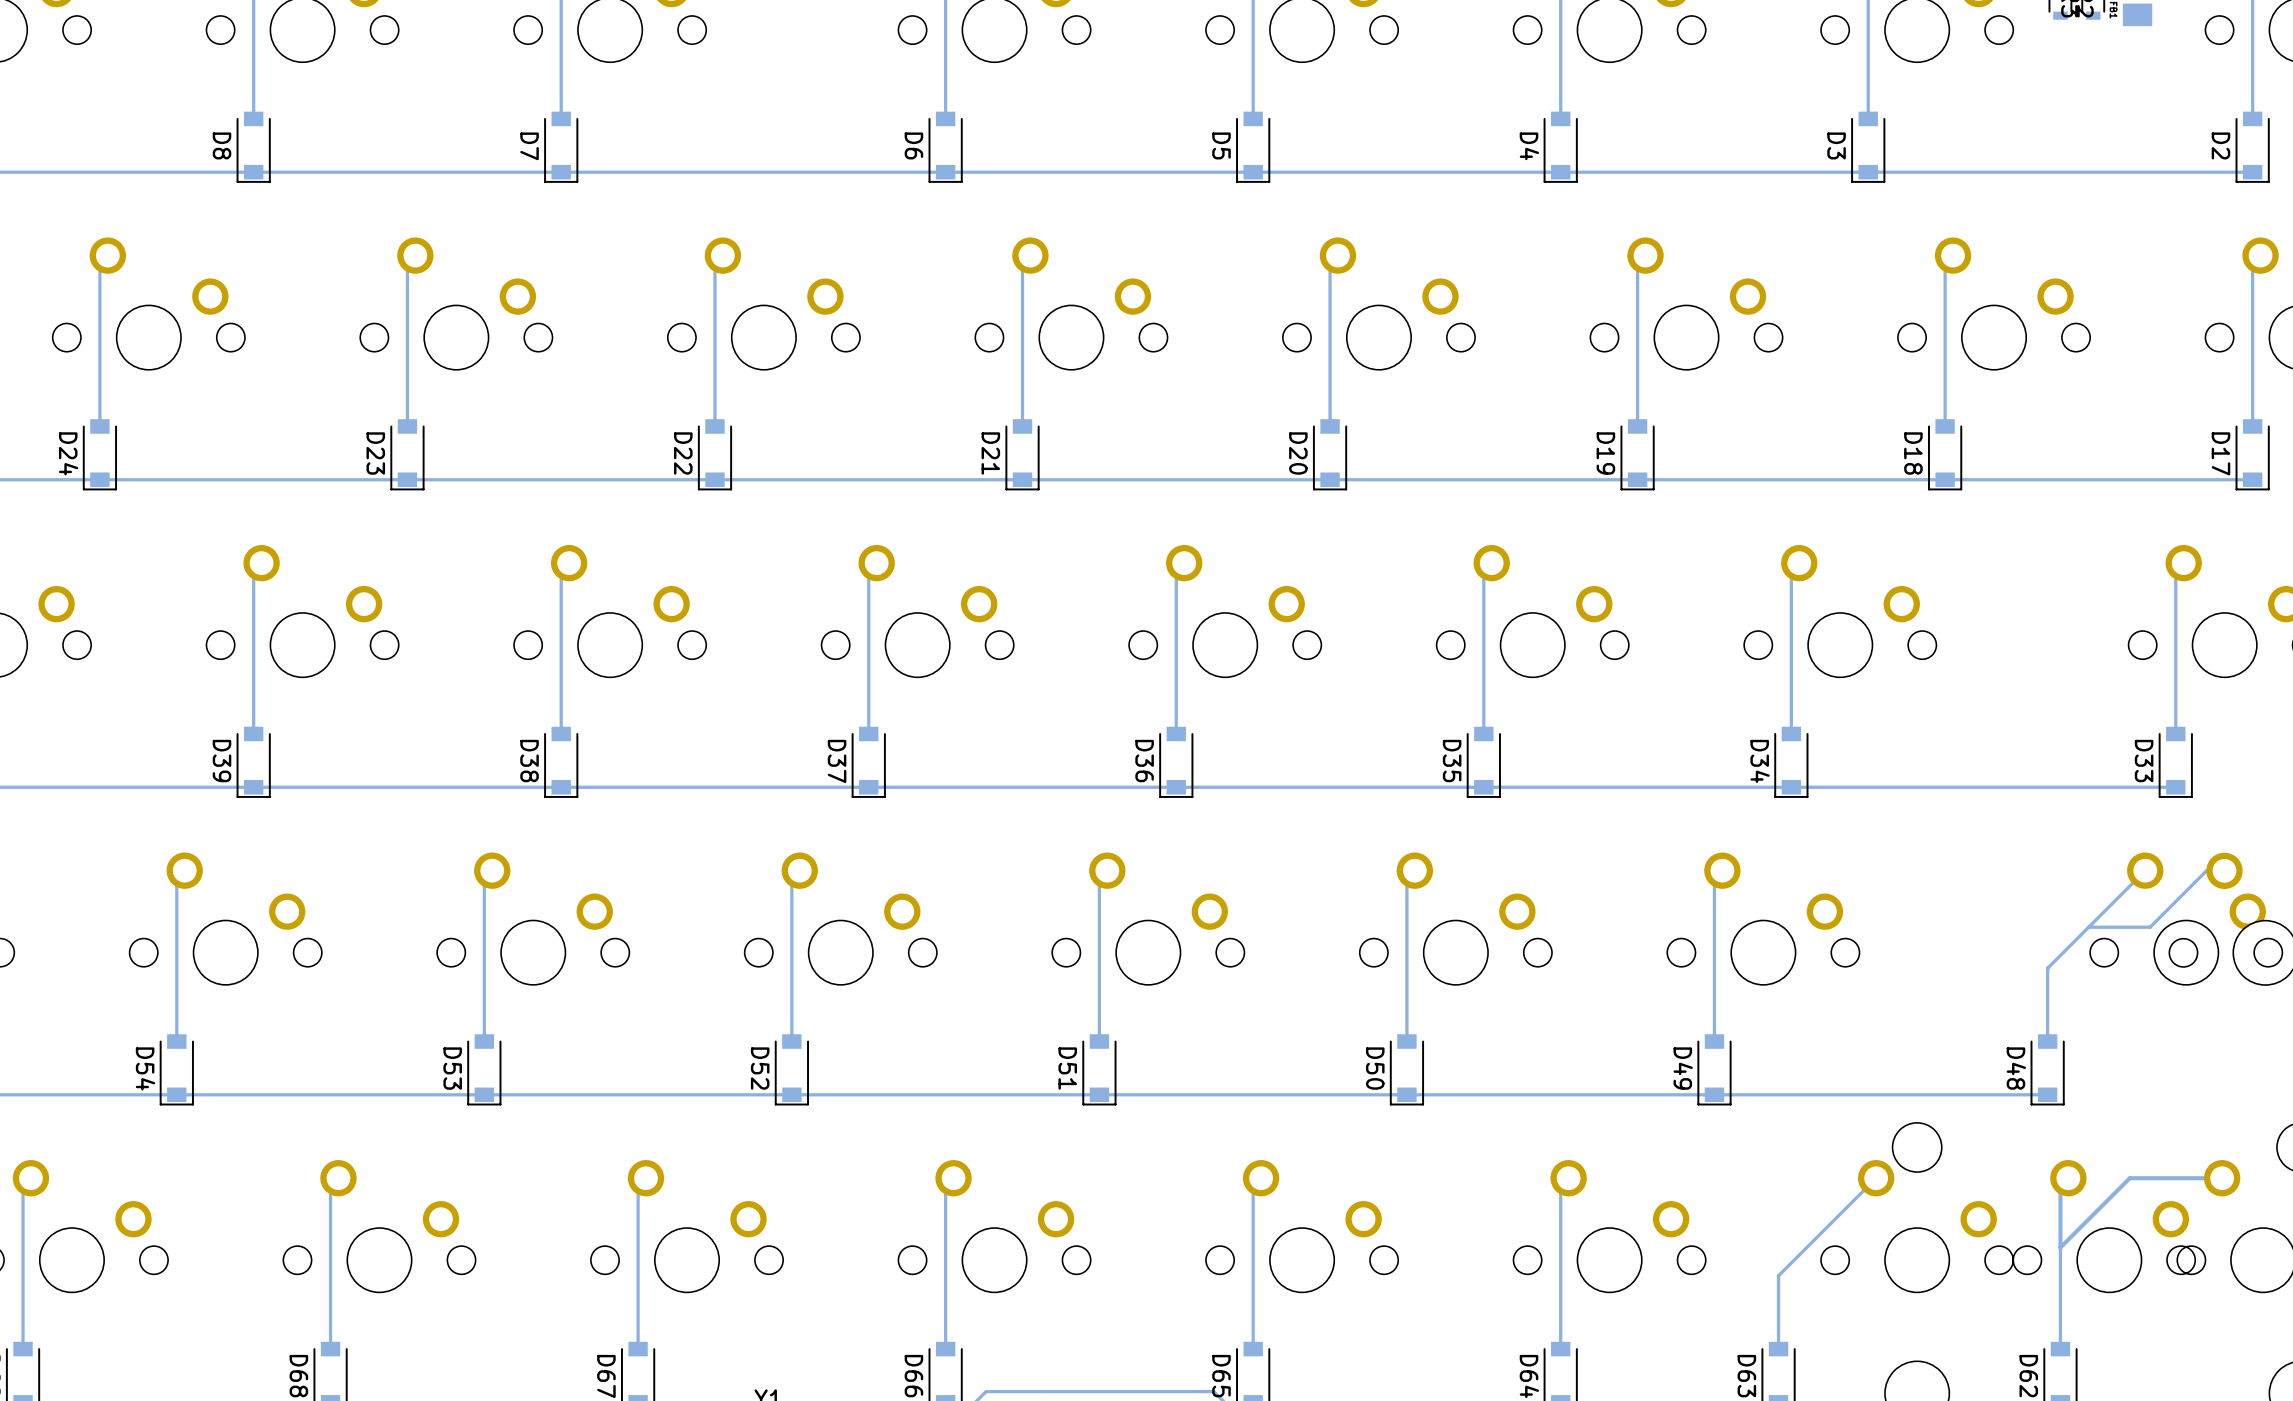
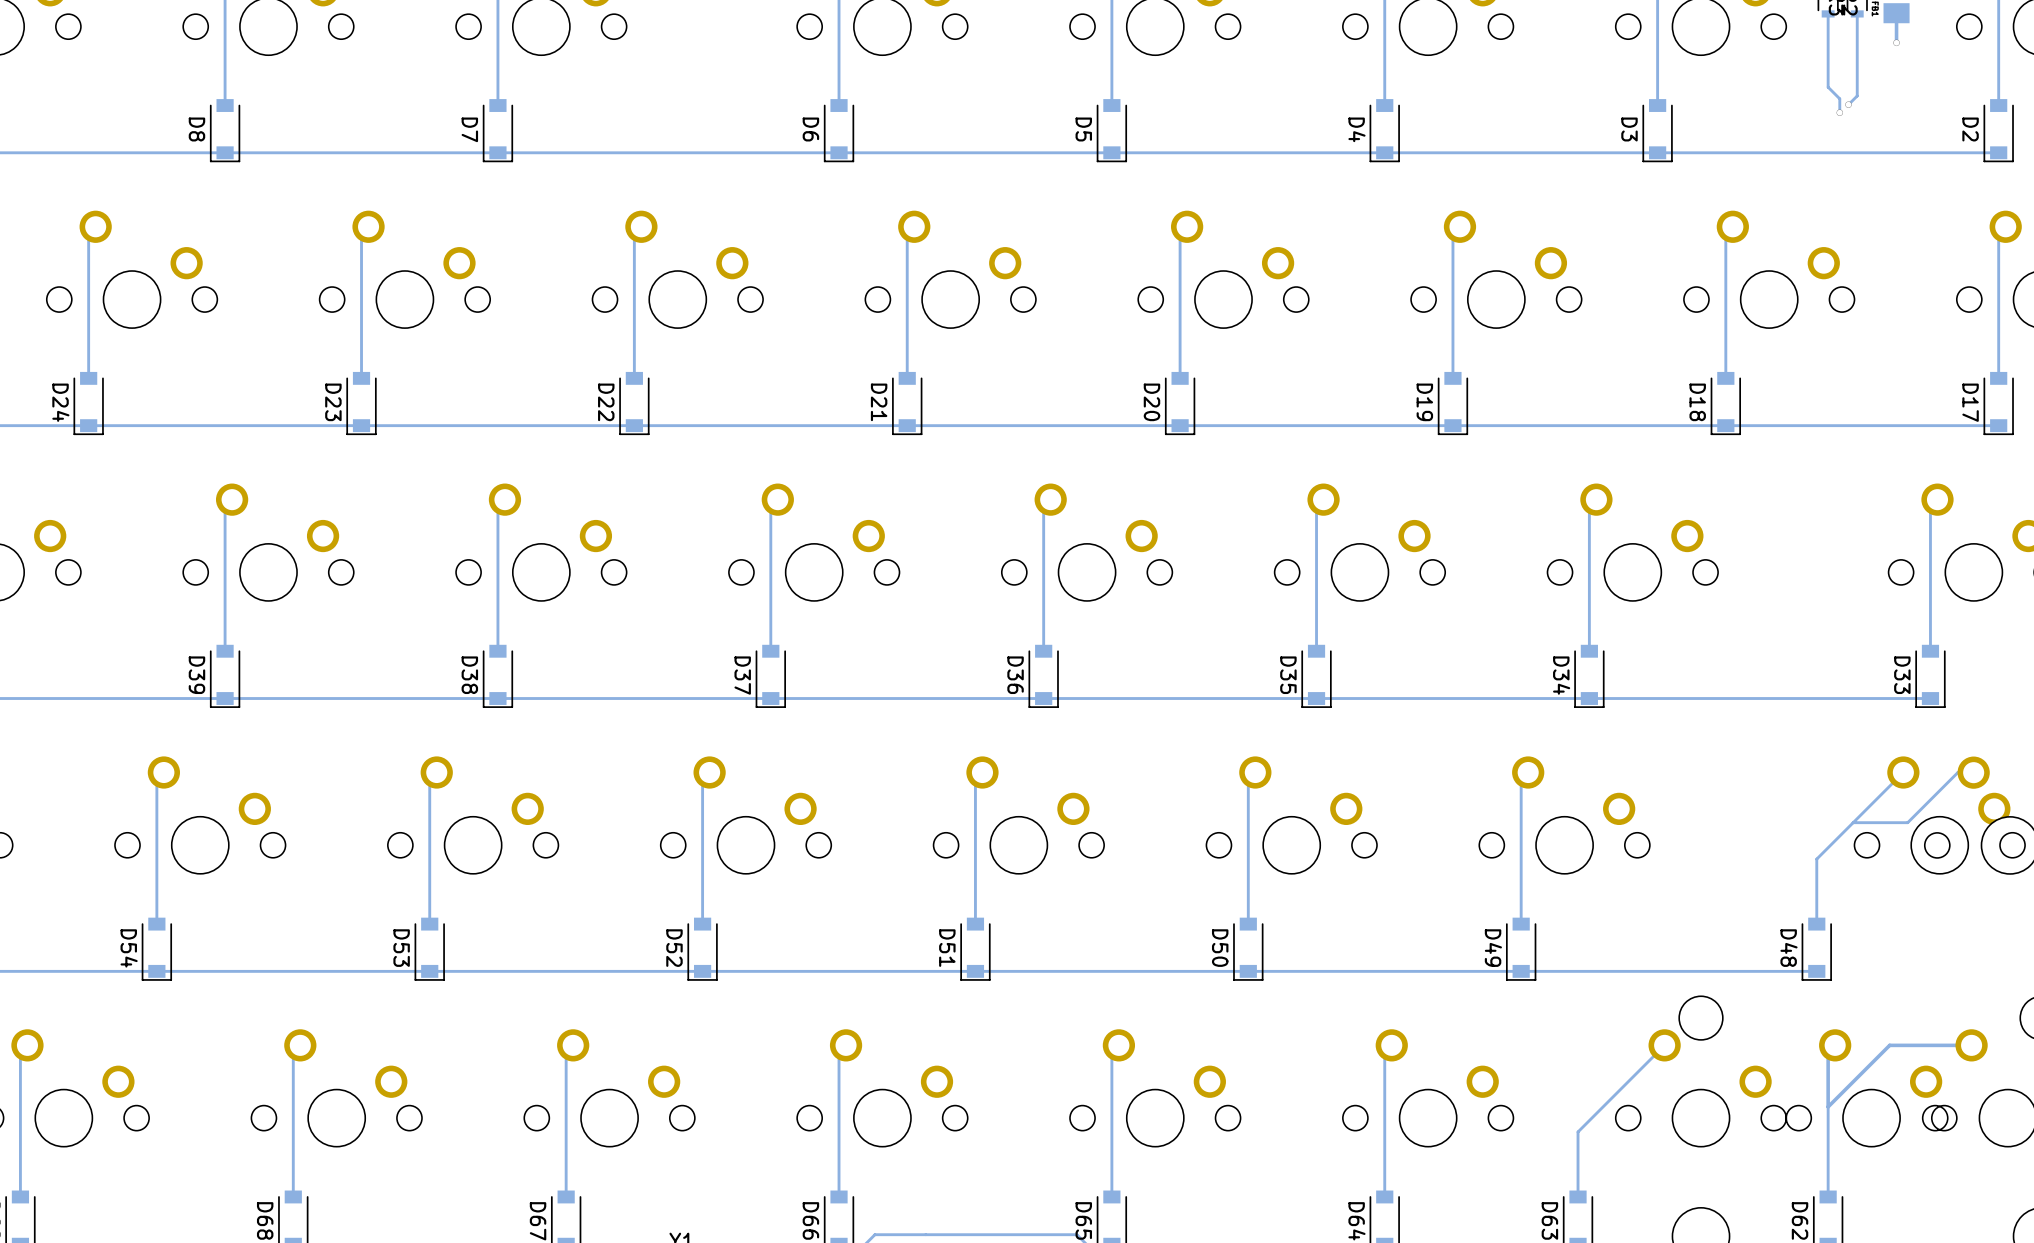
track: none -> (1896, 13) (1896, 42)
track: none -> (1828, 13) (1828, 87) (1839, 98) (1839, 112)
track: none -> (1857, 13) (1857, 95) (1848, 104)
via: none -> (1896, 42)
via: none -> (1848, 104)
via: none -> (1839, 112)

